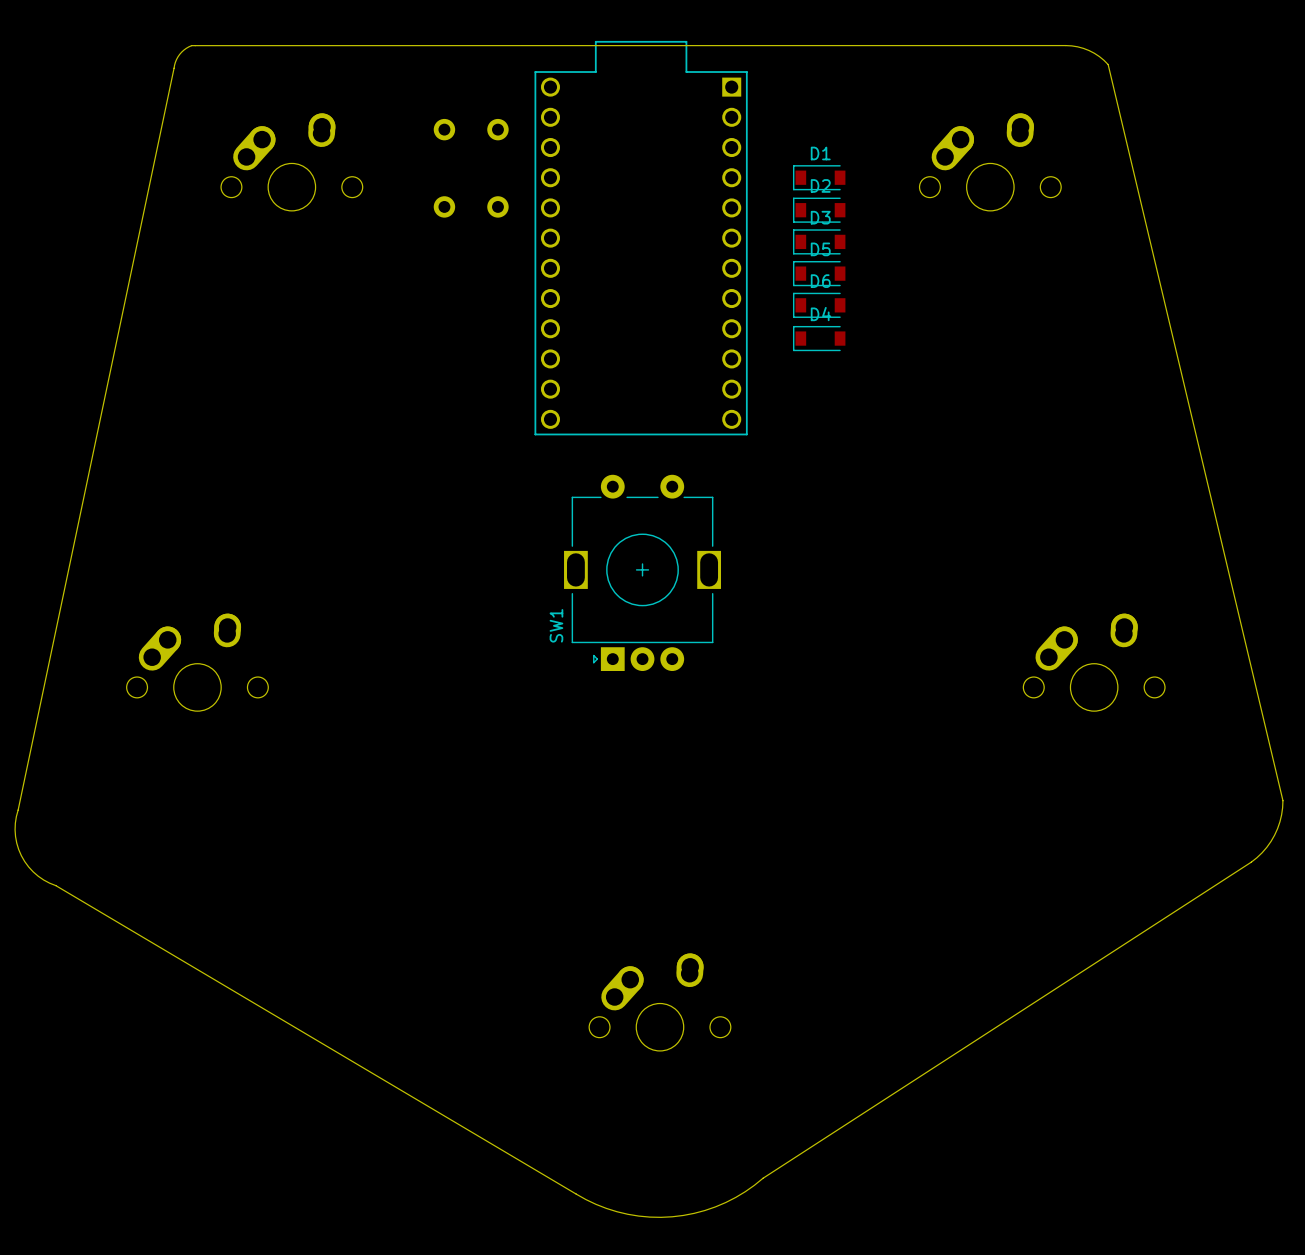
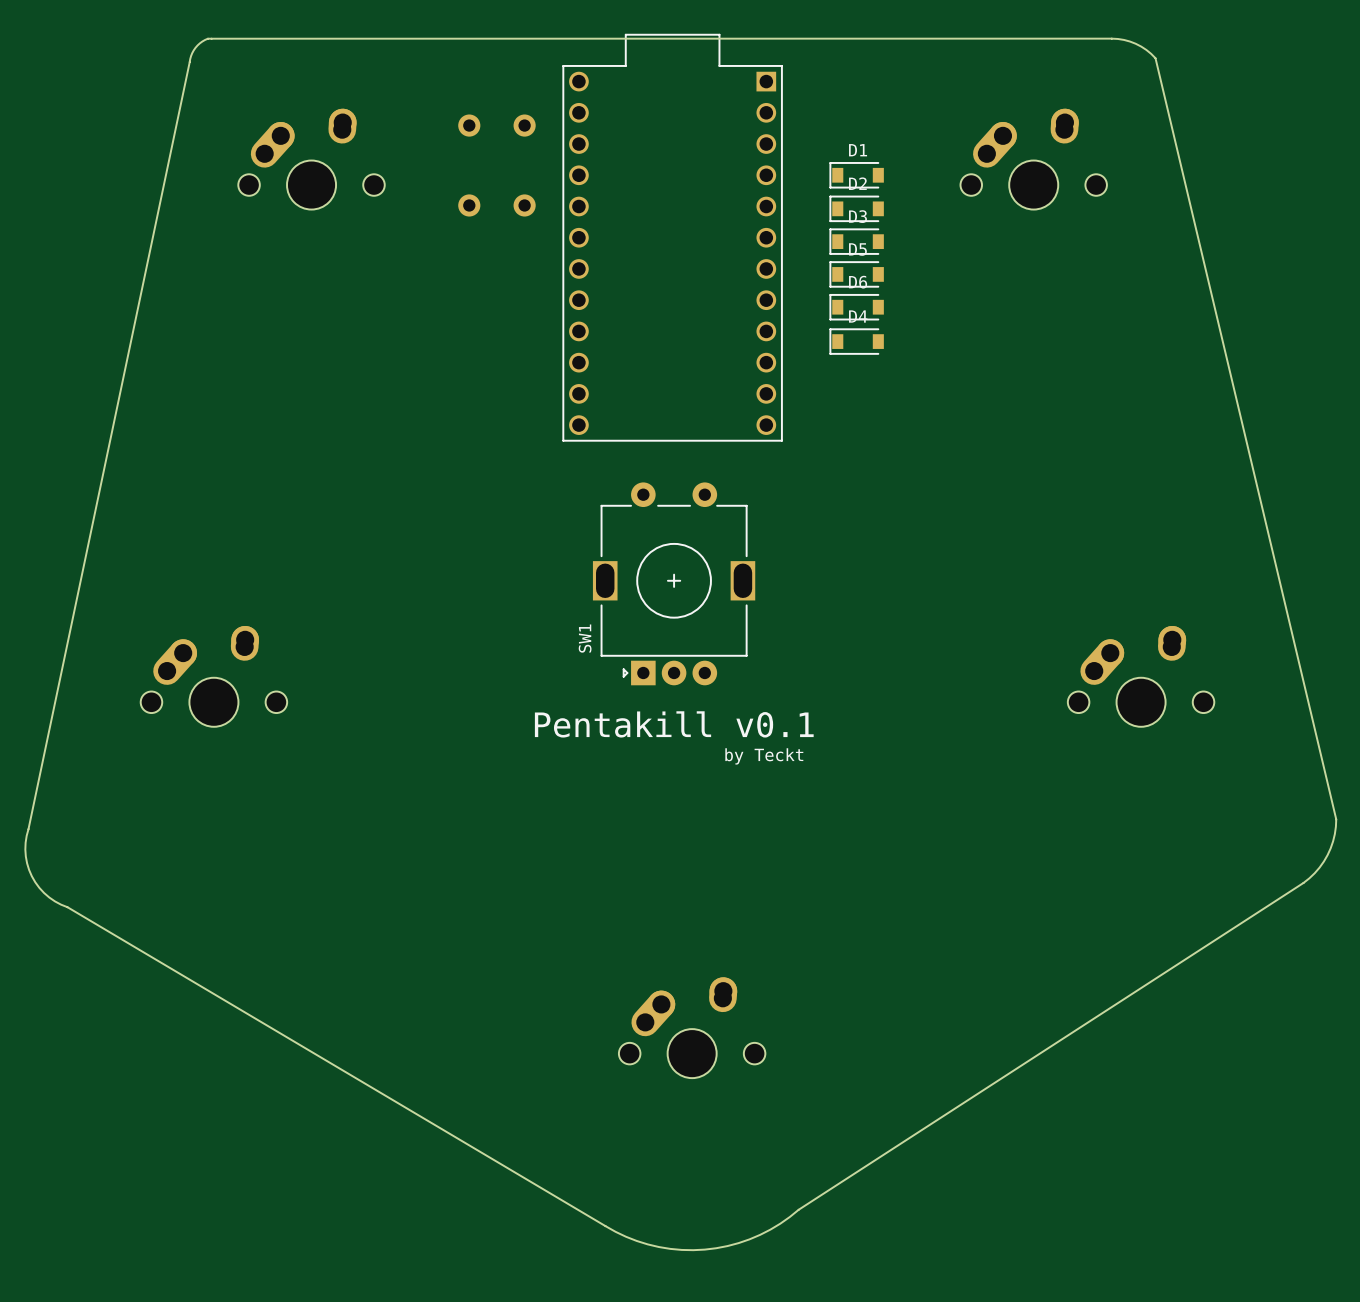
text: none -> Pentakill v0.1 (674, 724)
text: none -> by Teckt (764, 756)

